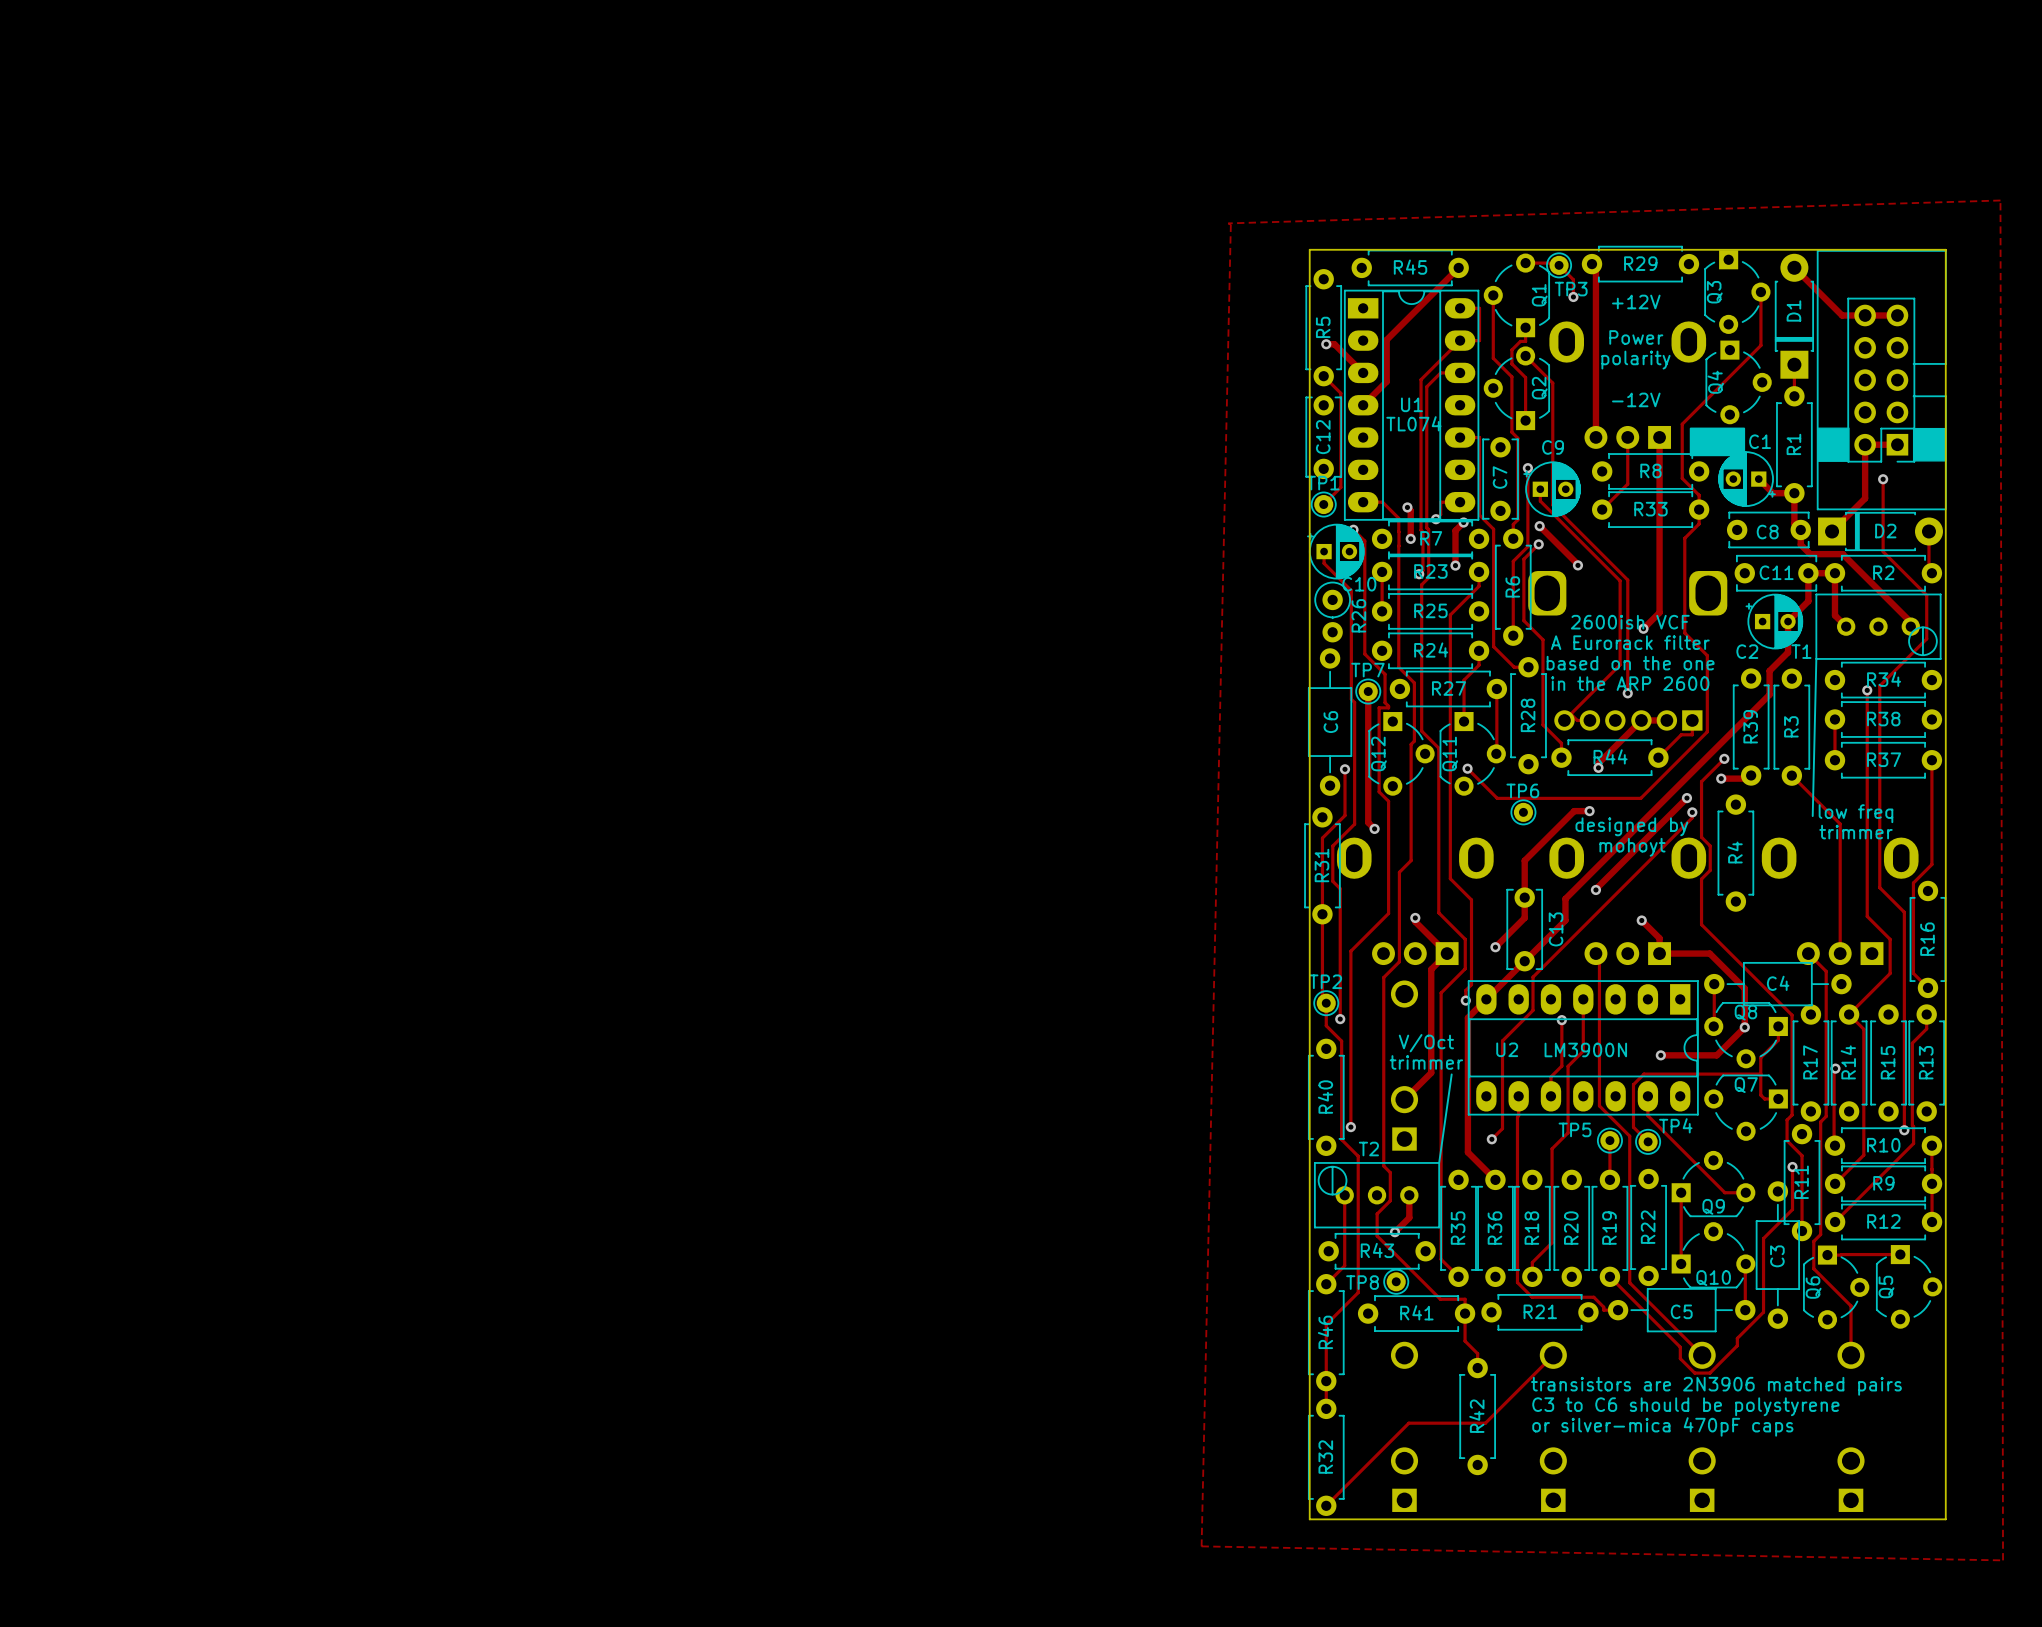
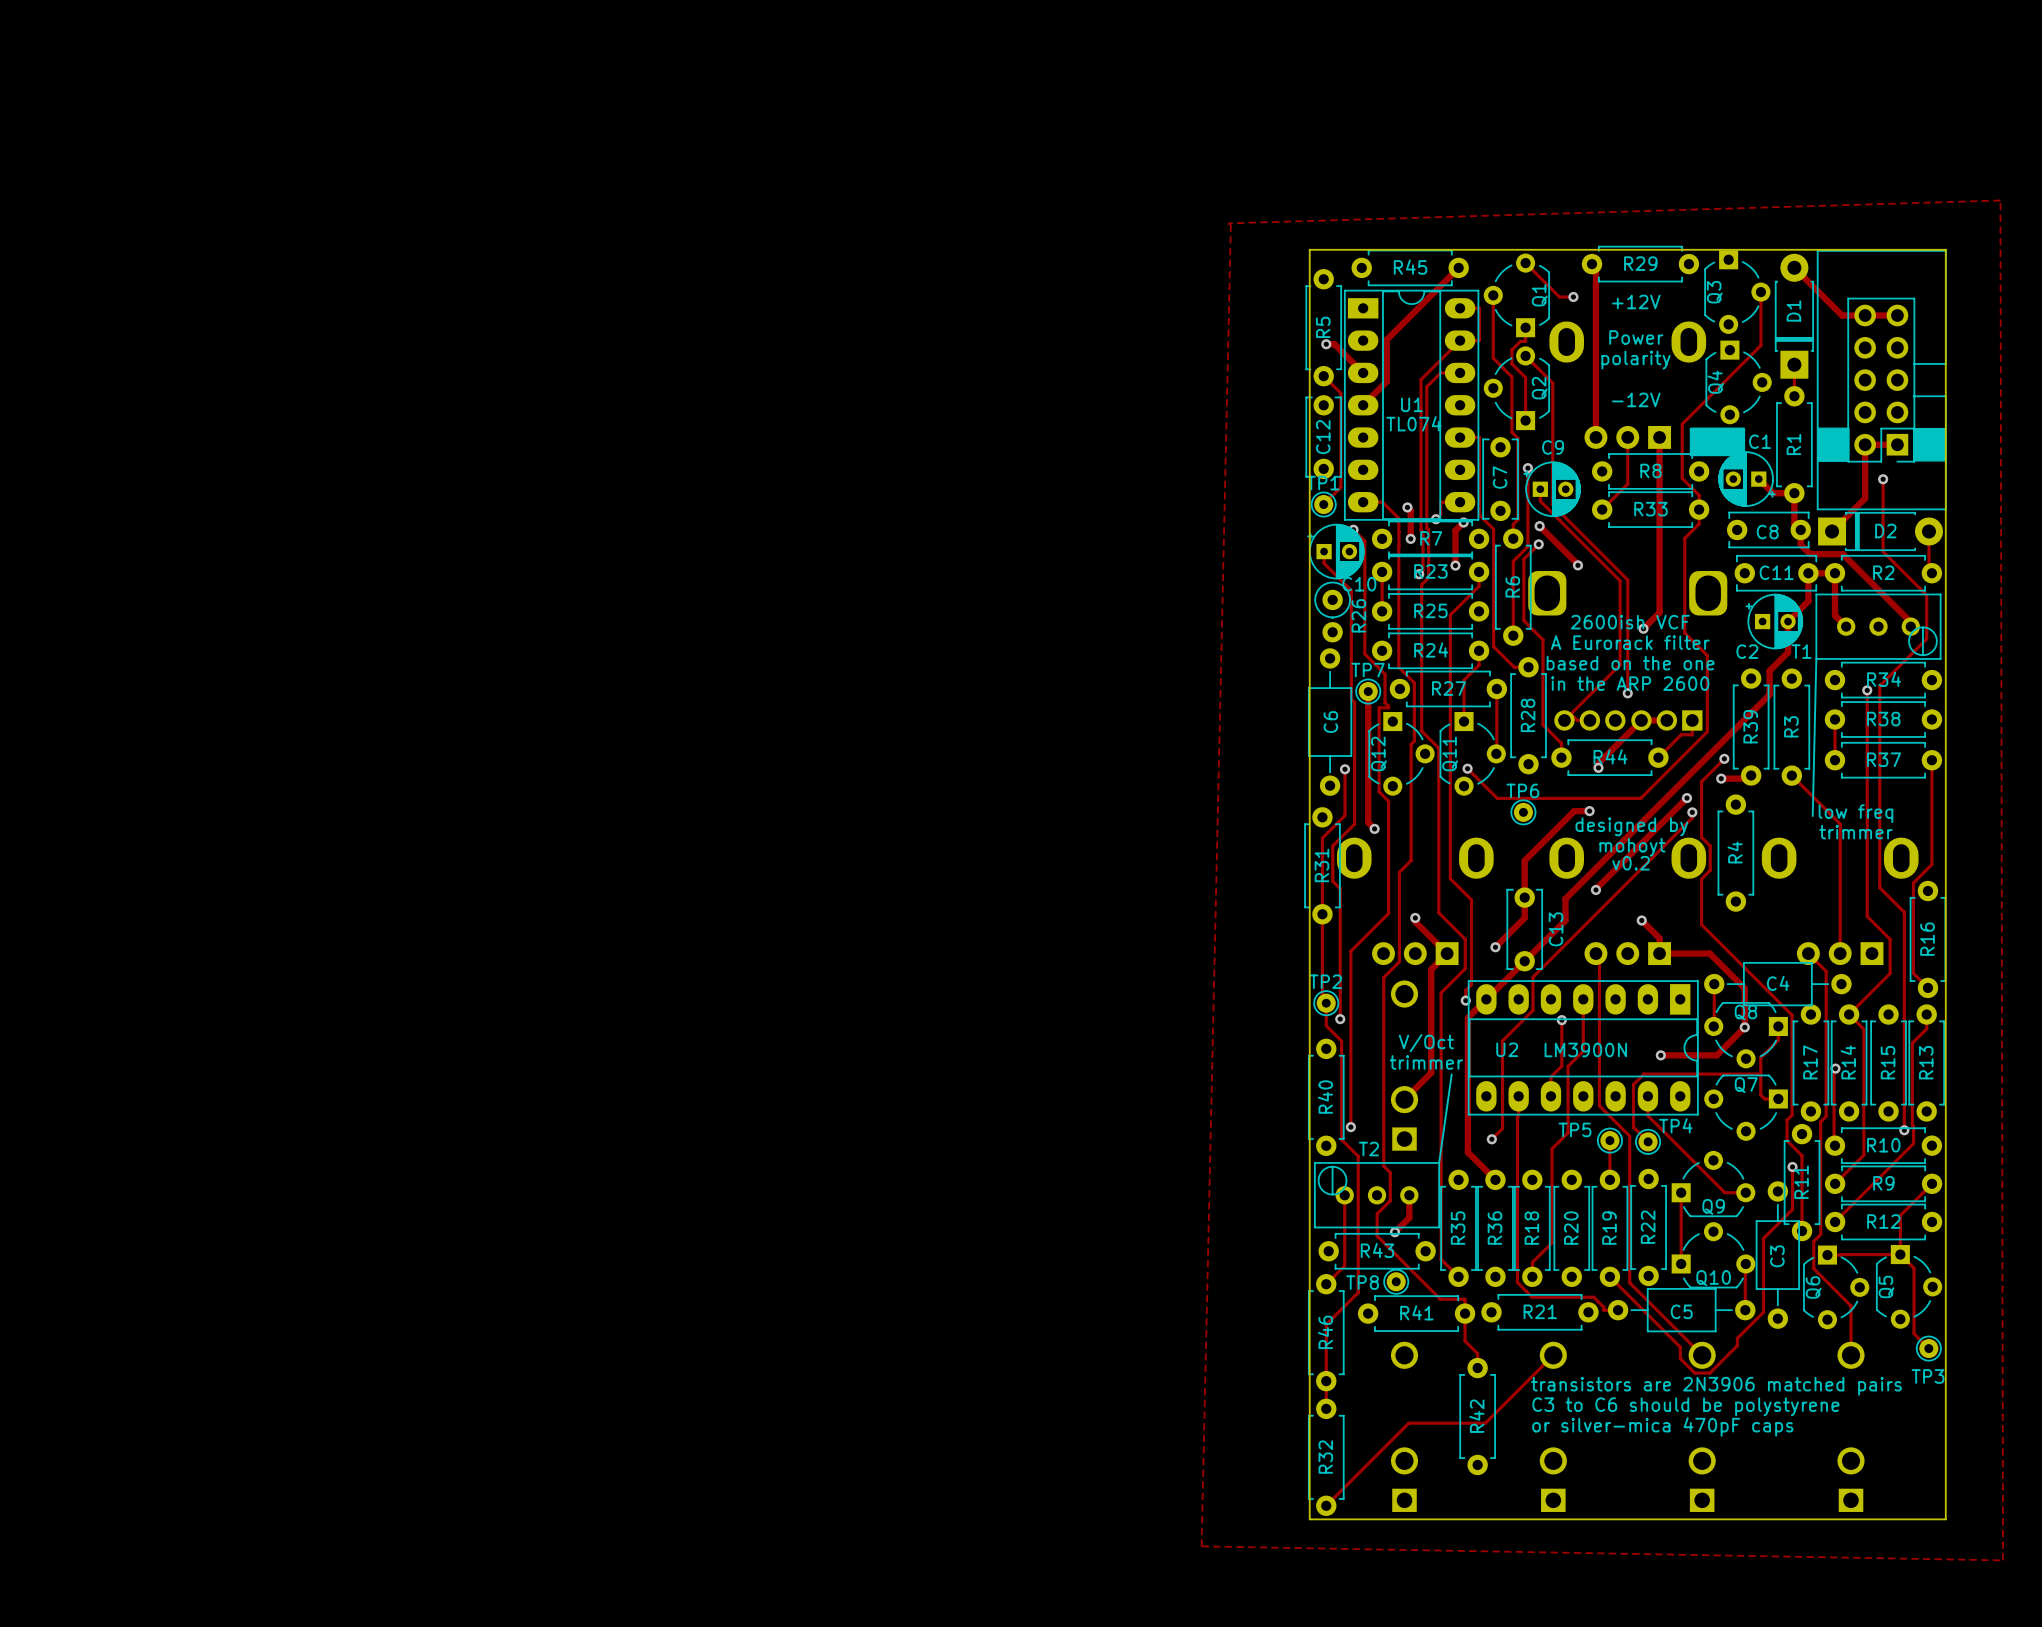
track: (1525, 263) (1556, 263) -> none
track: (1559, 265) (1573, 279) (1573, 296) -> (1525, 263) (1559, 296) (1573, 296)
TP3 position: (1559, 265) -> (1928, 1348)
TP3 name position: TP3 (1571, 289) -> TP3 (1928, 1376)
text: none -> v0.2 (1631, 863)
track: (1931, 1145) (1931, 1169) -> none
track: (1932, 1169) (1932, 1221) -> none
track: none -> (1932, 1183) (1900, 1215) (1900, 1254) (1914, 1268) (1914, 1333) (1928, 1348)

